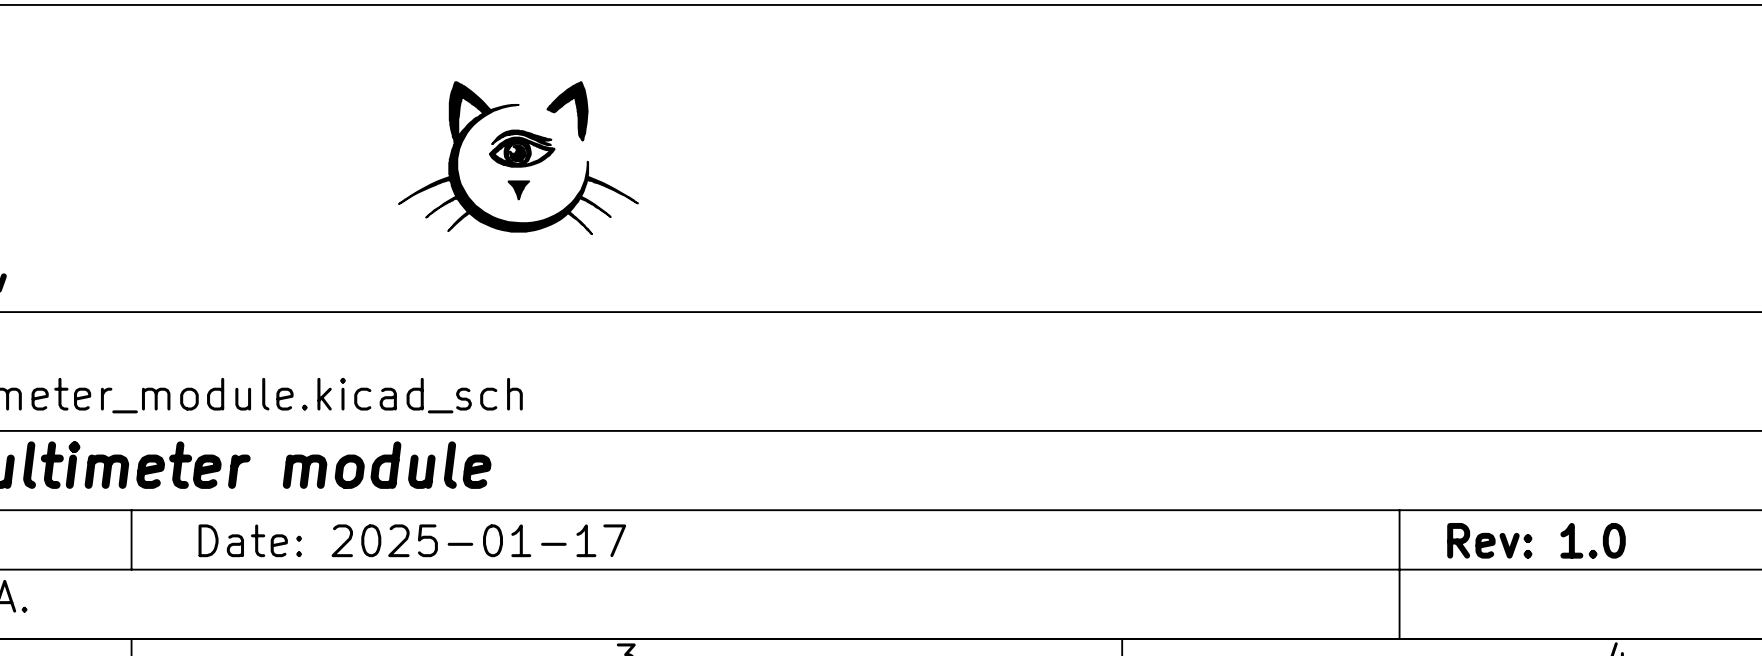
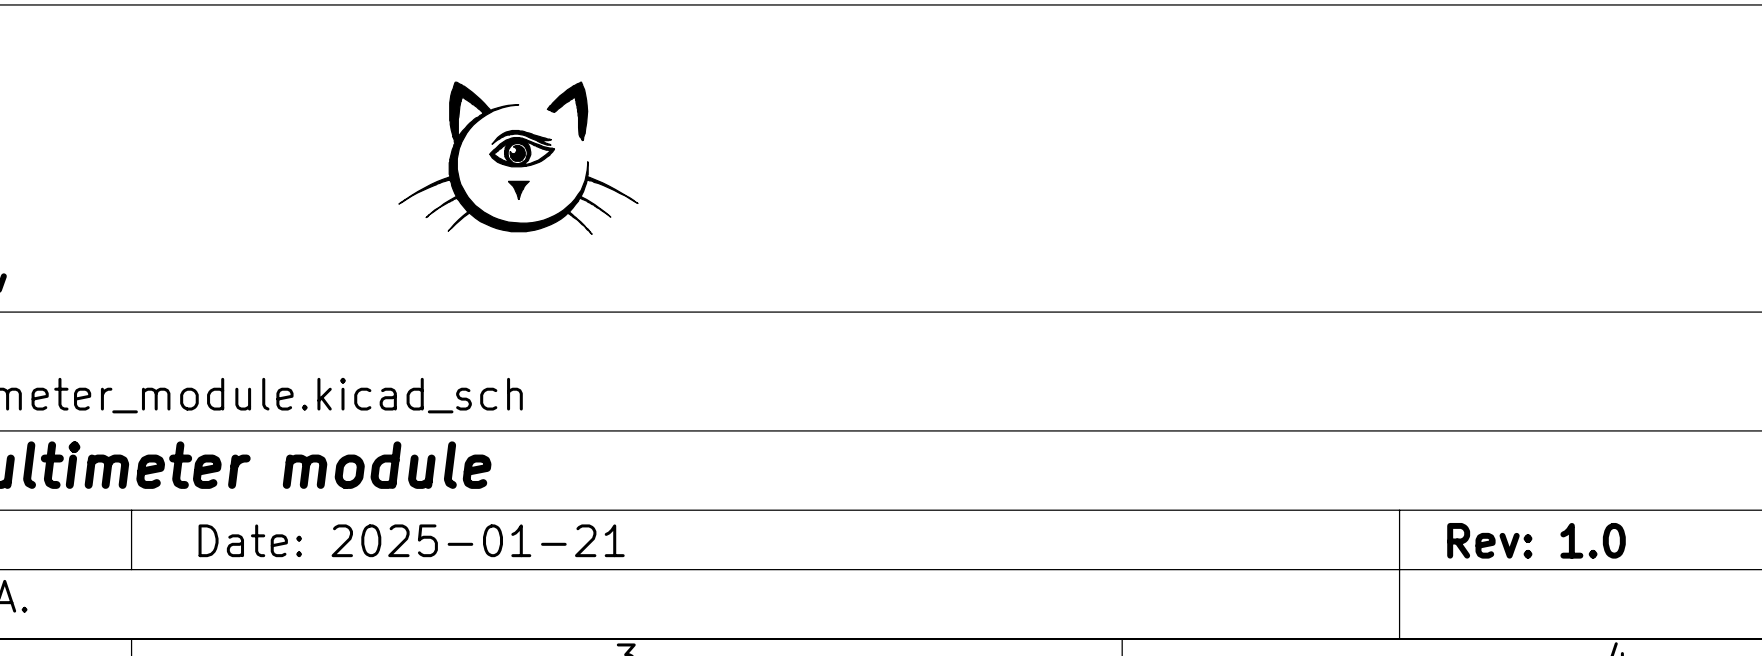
title block: Date: 2025-01-17 (412, 540) -> Date: 2025-01-21 (411, 540)

